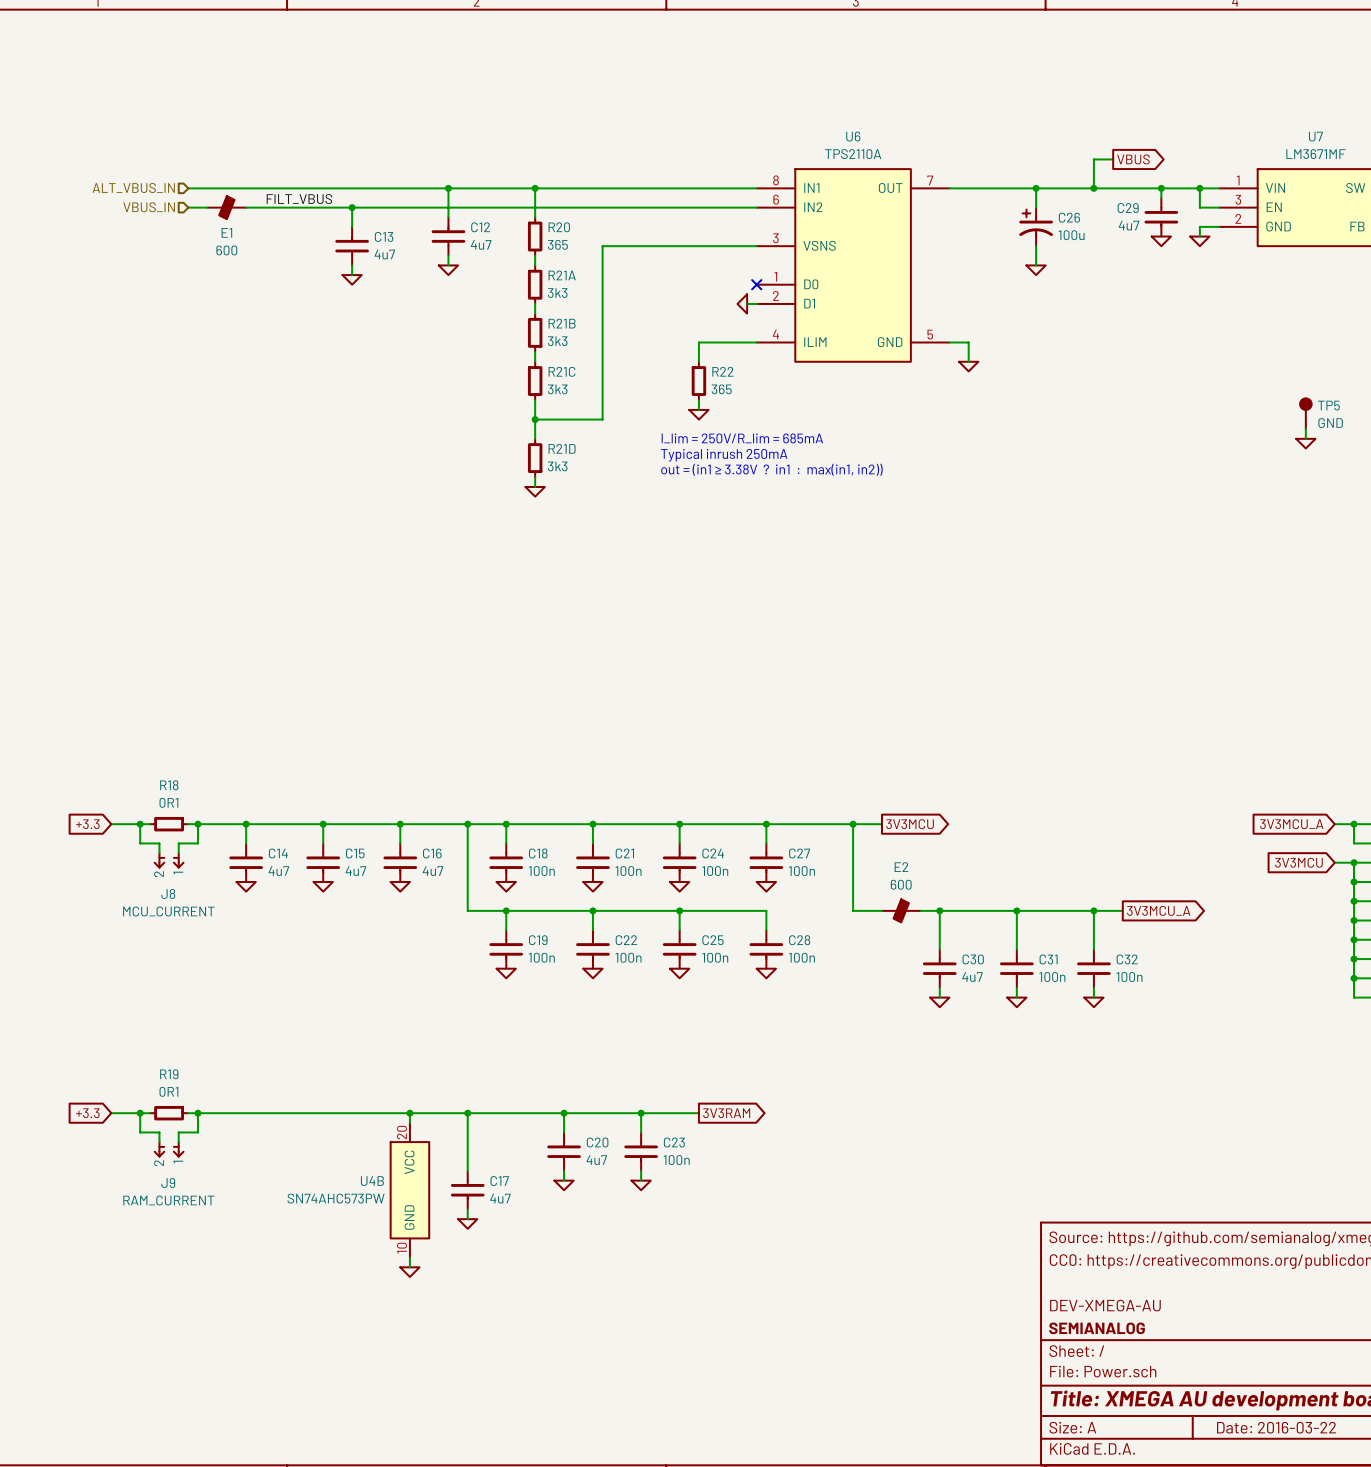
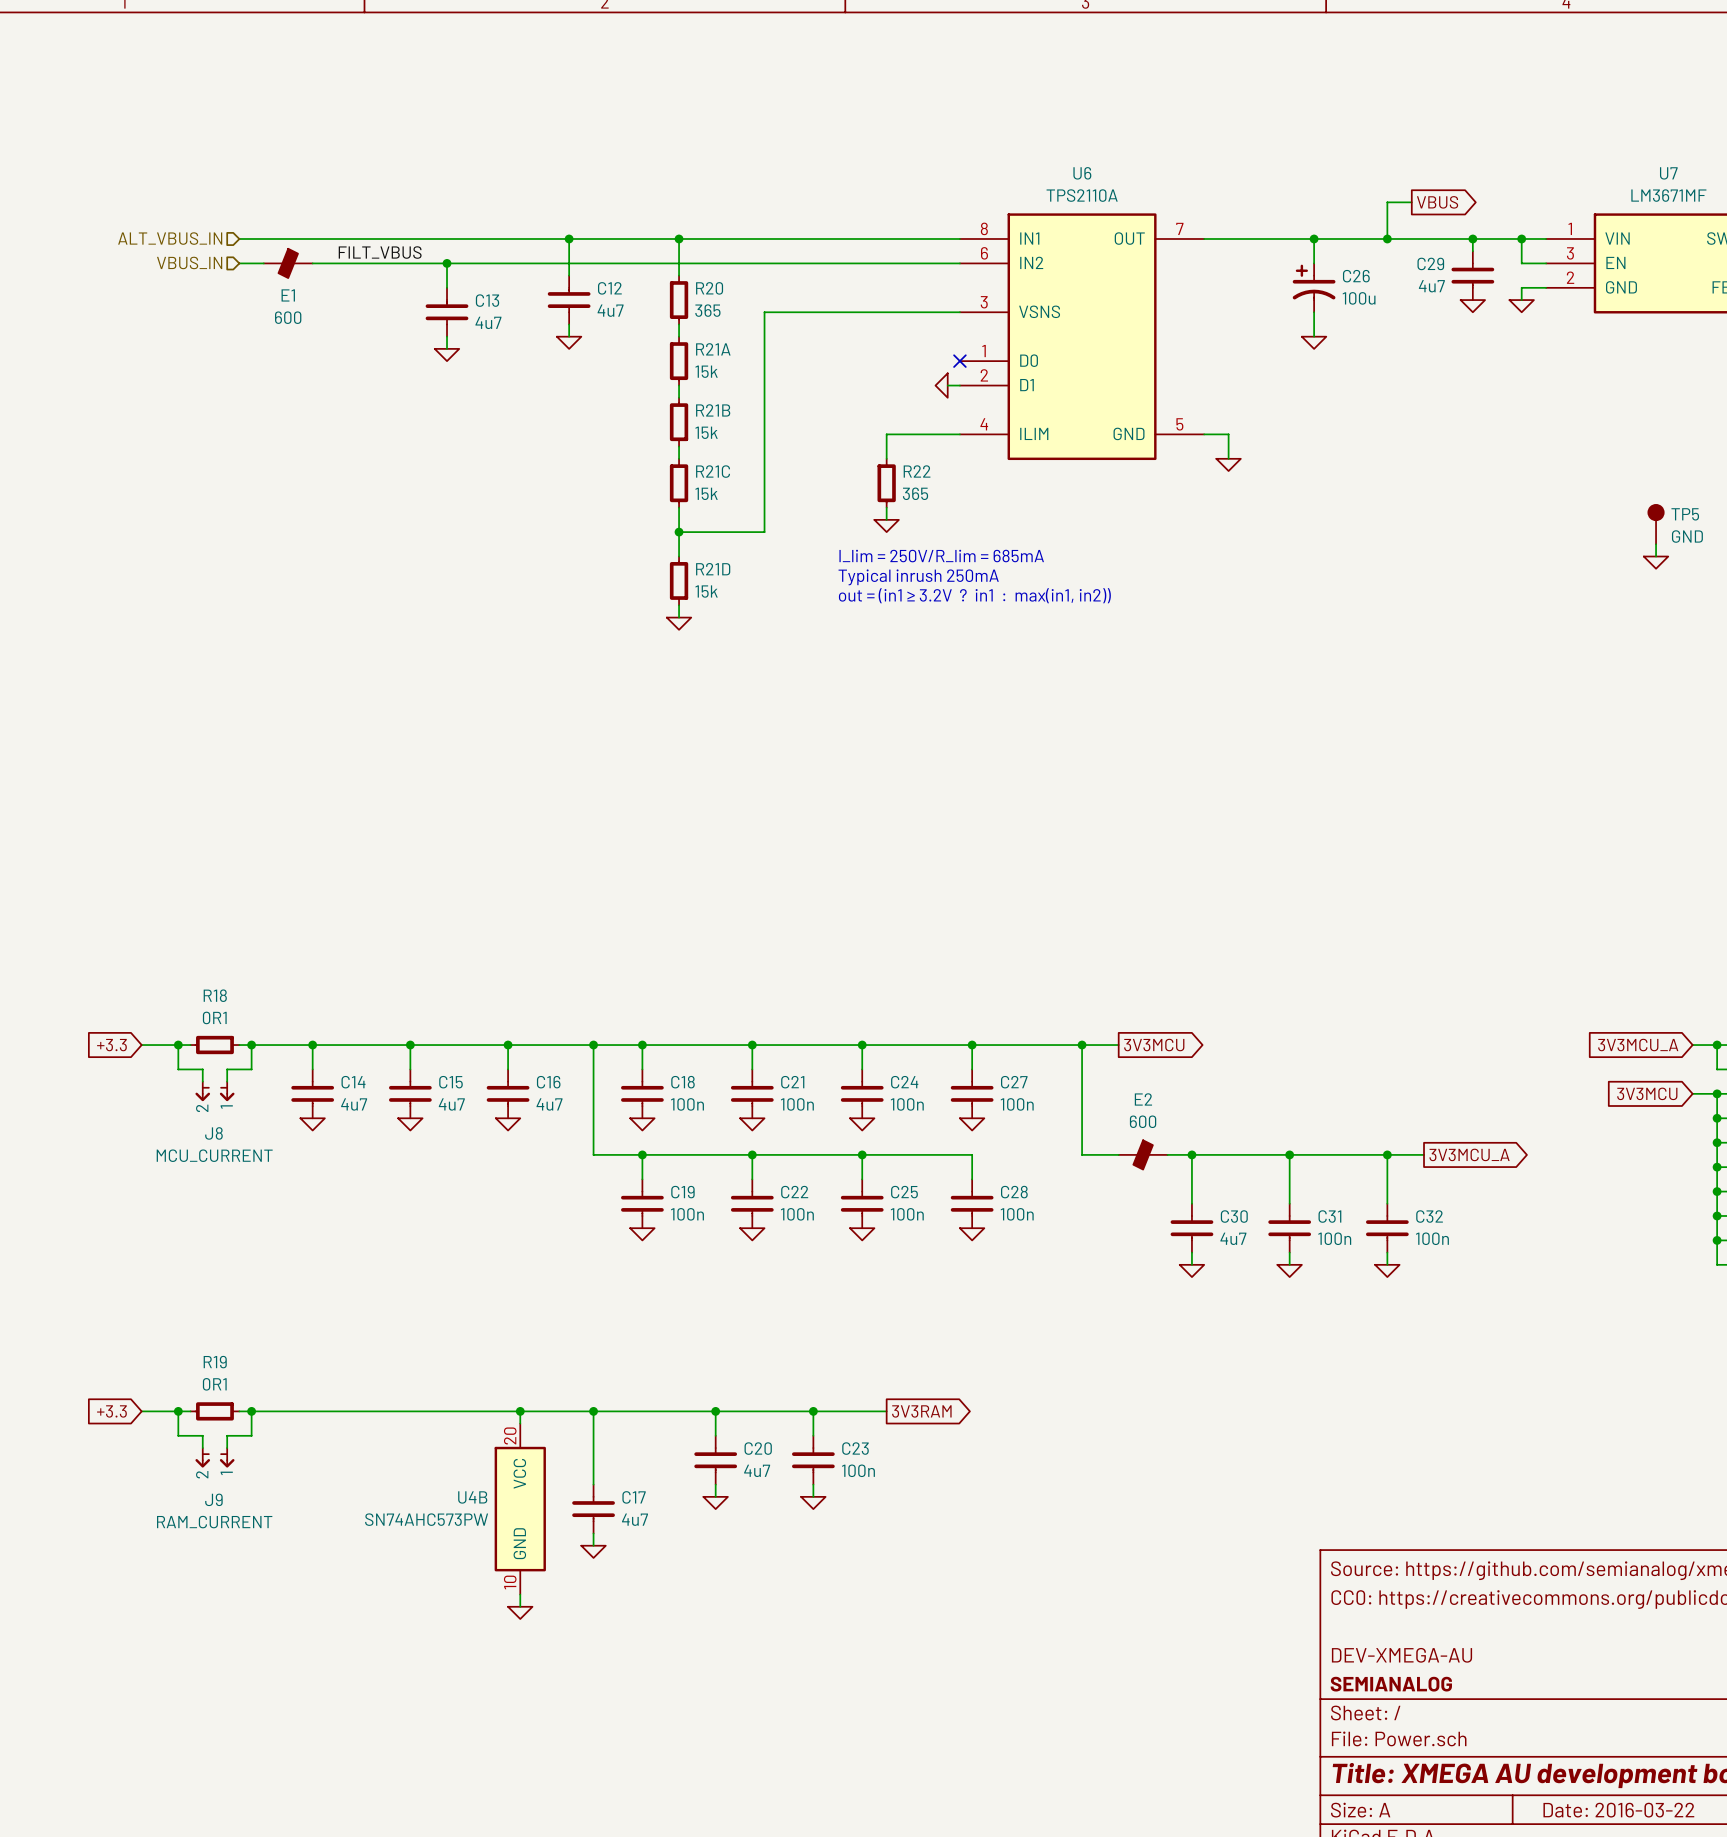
R21A value: 3k3 (557, 293) -> 15k (706, 371)
R21B value: 3k3 (557, 341) -> 15k (706, 432)
R21C value: 3k3 (557, 389) -> 15k (706, 493)
R21D value: 3k3 (557, 466) -> 15k (706, 591)
text: out = (in1 ≥ 3.38V ? in1 : max(in1, in2)) (771, 469) -> out = (in1 ≥ 3.2V ? in1 : max(in1, in2)) (974, 595)

